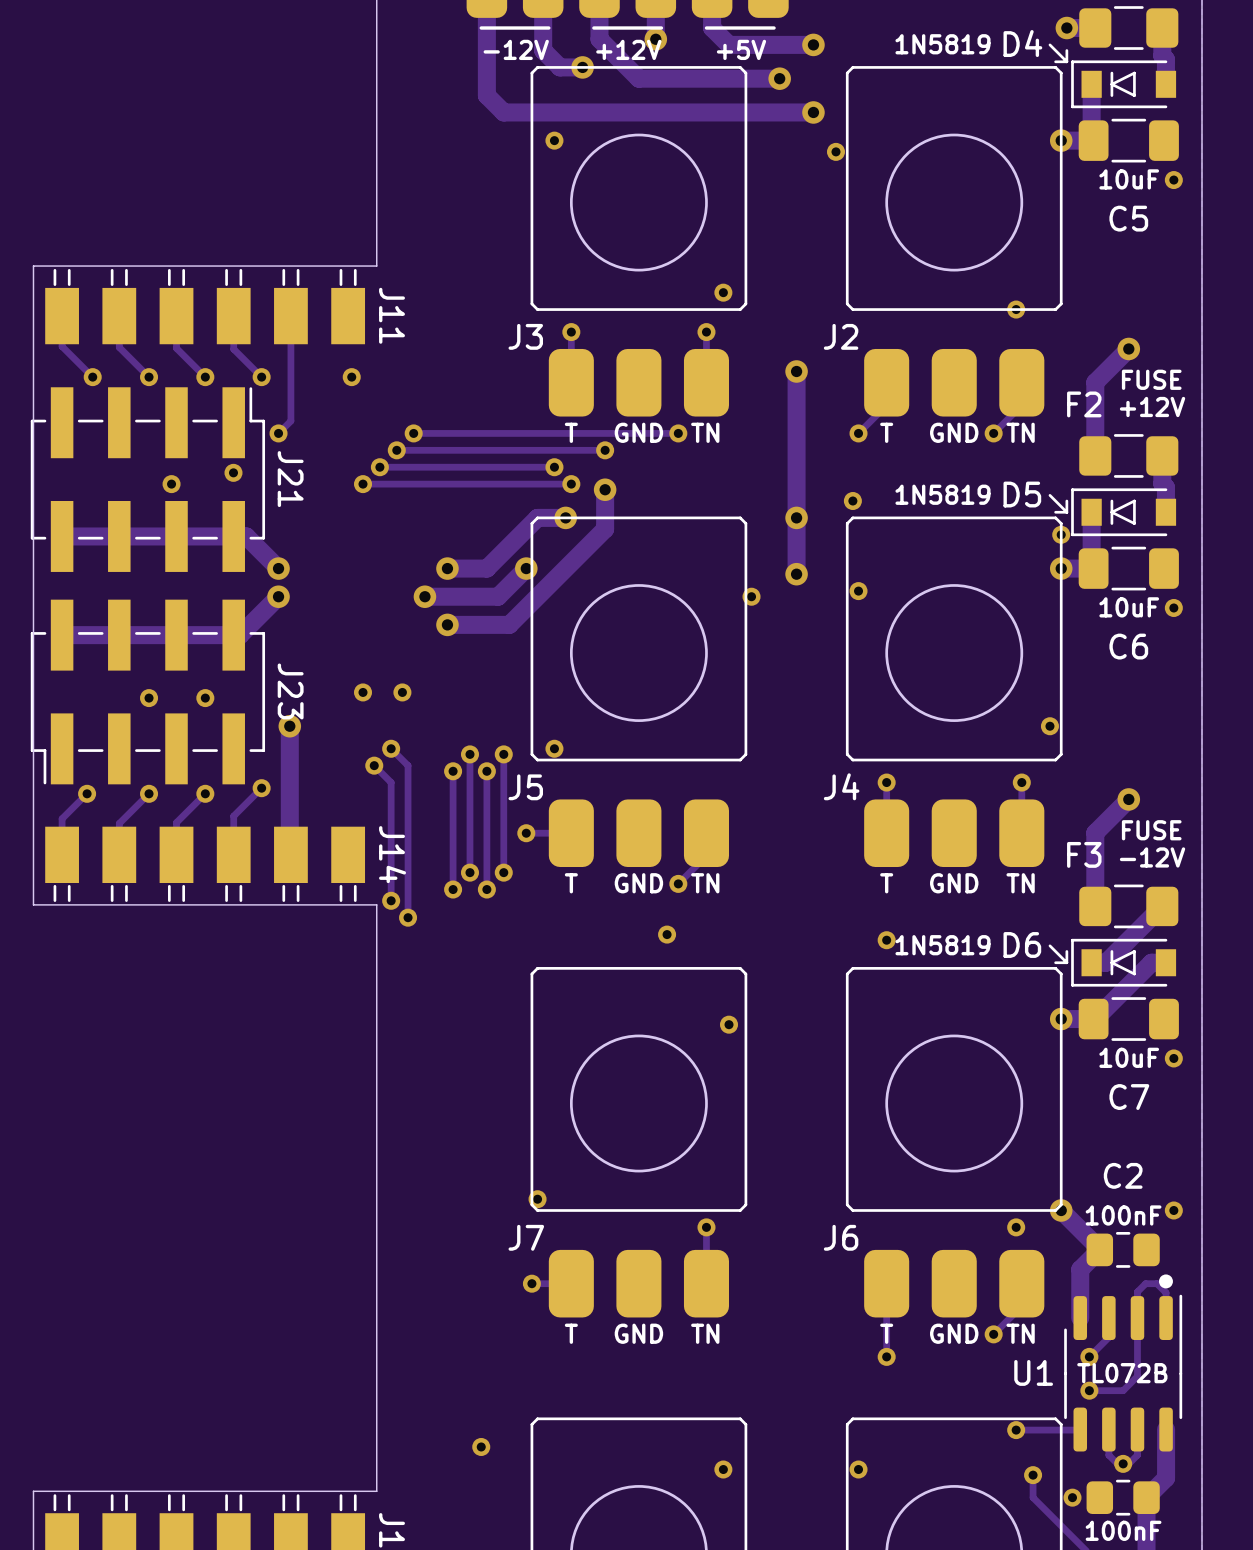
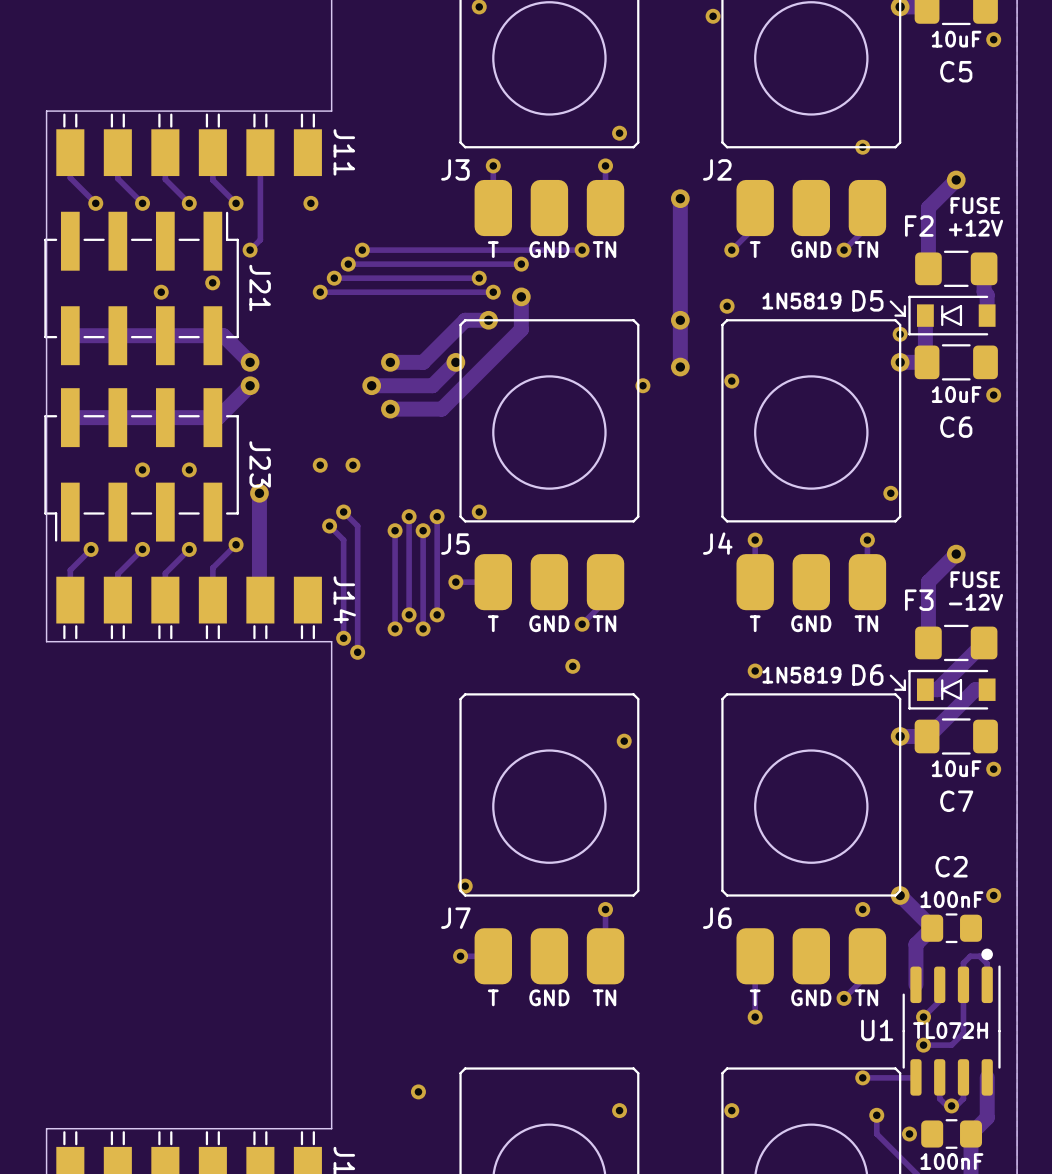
U1 value: TL072B (1122, 1373) -> TL072H (950, 1030)

